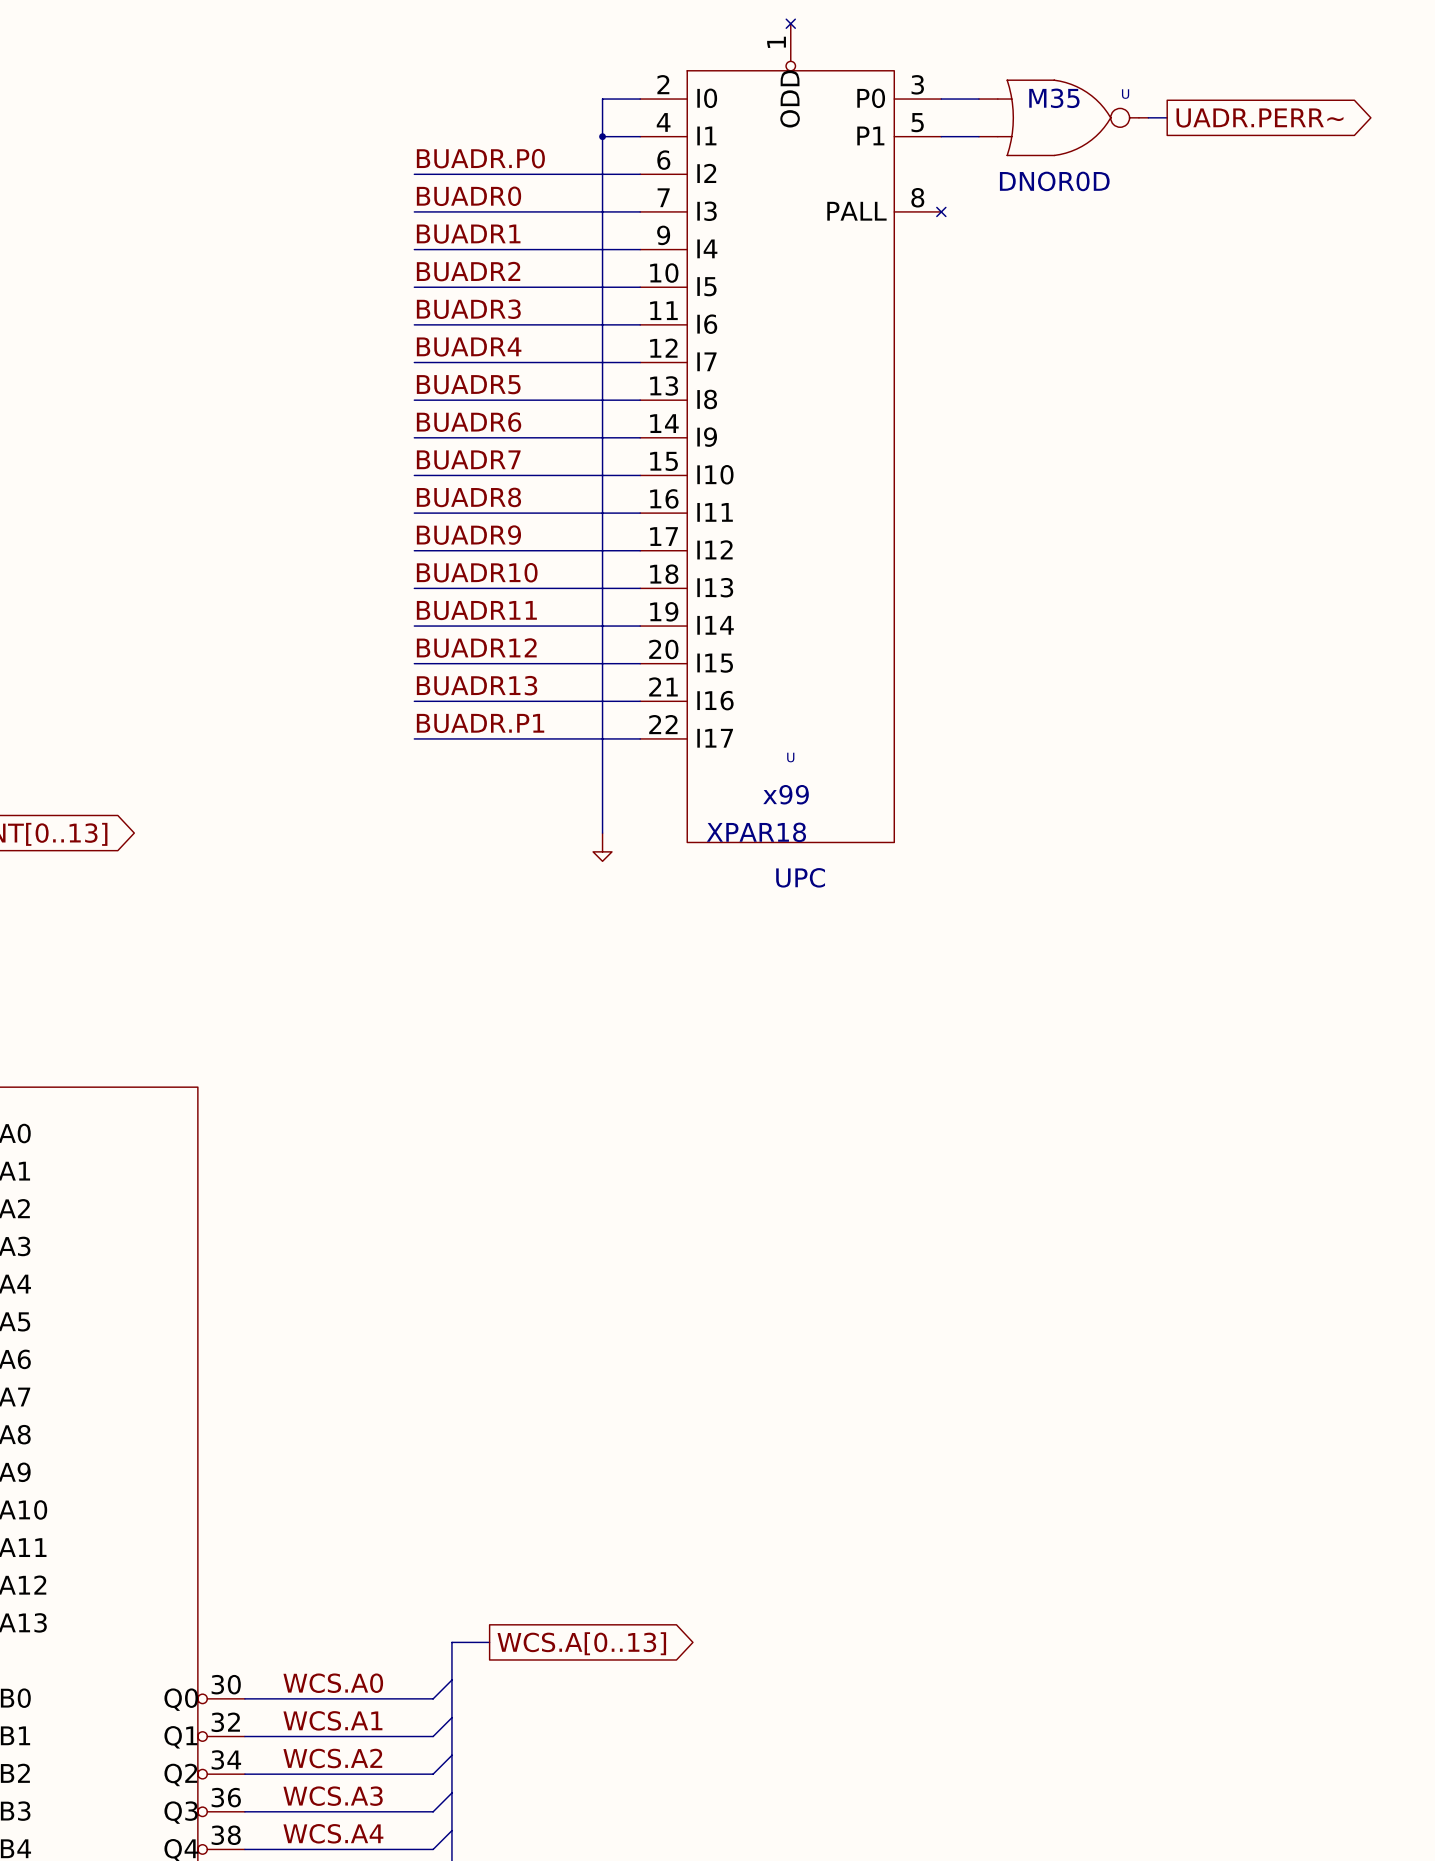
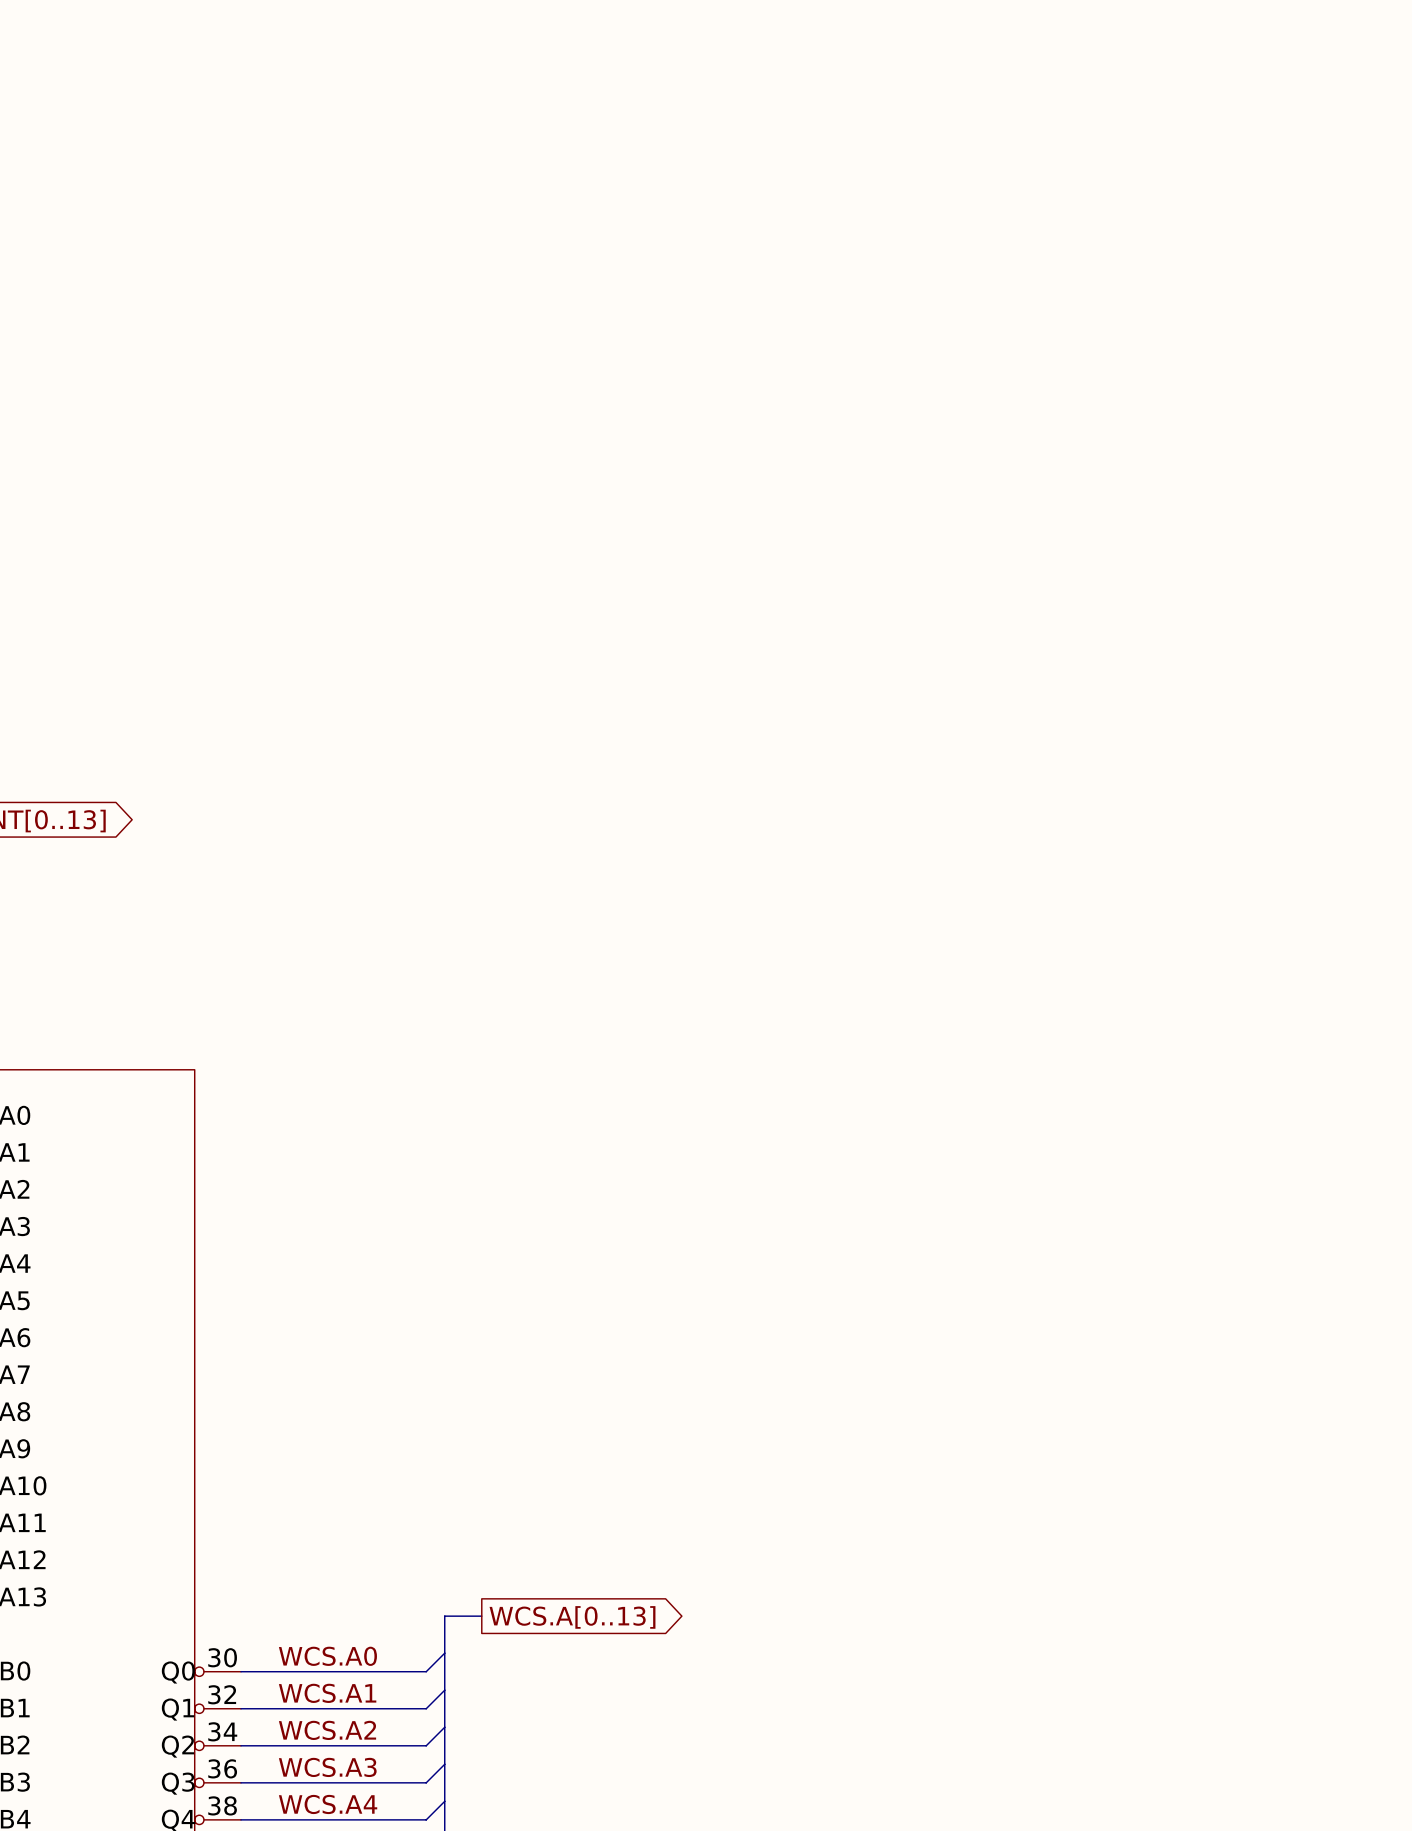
no-connect mark: (790, 23) -> none
wire: (640, 99) (602, 99) (602, 833) -> none
wire: (941, 99) (978, 99) -> none
U: (1063, 117) -> none
wire: (1148, 117) (1167, 117) -> none
global label: UADR.PERR~ (1259, 118) -> none
wire: (602, 136) (640, 136) -> none
junction: (602, 136) -> none
wire: (941, 136) (978, 136) -> none
label: BUADR.P0 (480, 158) -> none
wire: (414, 174) (640, 174) -> none
label: BUADR0 (468, 196) -> none
wire: (414, 211) (640, 211) -> none
no-connect mark: (941, 211) -> none
label: BUADR1 (468, 234) -> none
wire: (414, 249) (640, 249) -> none
label: BUADR2 (468, 271) -> none
wire: (414, 287) (640, 287) -> none
label: BUADR3 (468, 309) -> none
wire: (414, 324) (640, 324) -> none
label: BUADR4 (469, 347) -> none
wire: (414, 362) (640, 362) -> none
label: BUADR5 (468, 384) -> none
wire: (414, 400) (640, 400) -> none
label: BUADR6 (469, 422) -> none
U: XPAR18 (790, 433) -> none
wire: (414, 437) (640, 437) -> none
label: BUADR7 (468, 459) -> none
wire: (414, 475) (640, 475) -> none
label: BUADR8 (468, 497) -> none
wire: (414, 513) (640, 513) -> none
label: BUADR9 (468, 535) -> none
wire: (414, 550) (640, 550) -> none
label: BUADR10 (477, 572) -> none
wire: (414, 588) (640, 588) -> none
label: BUADR11 (476, 610) -> none
wire: (414, 626) (640, 626) -> none
label: BUADR12 (476, 648) -> none
wire: (414, 663) (640, 663) -> none
label: BUADR13 (477, 685) -> none
wire: (414, 701) (640, 701) -> none
label: BUADR.P1 (480, 723) -> none
wire: (414, 738) (640, 738) -> none
power symbol: (602, 847) -> none

